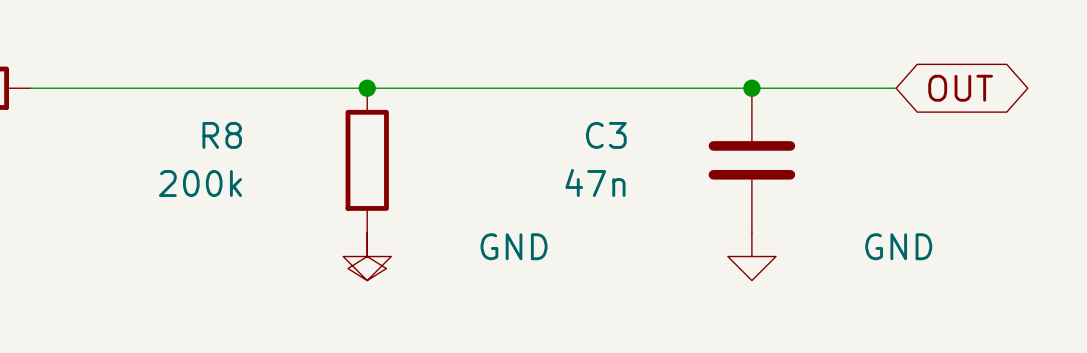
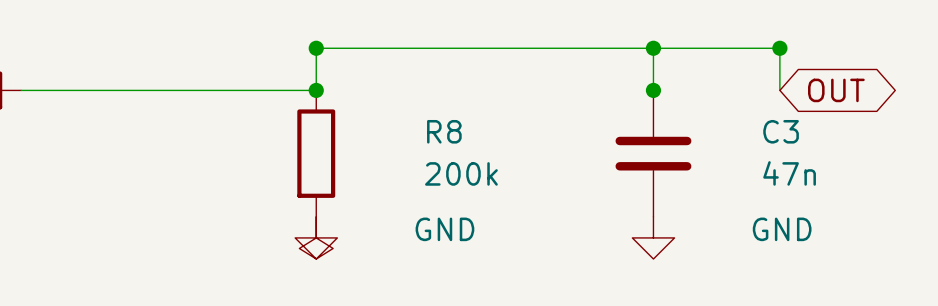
junction: none -> (316, 48)
wire: none -> (653, 48) (653, 90)
junction: none -> (653, 48)
junction: none -> (779, 48)
wire: (367, 88) (896, 88) -> (316, 90) (316, 48) (779, 48) (779, 90)
R8 name position: R8 (222, 135) -> R8 (444, 131)
C3 name position: C3 (606, 135) -> C3 (781, 131)
C3 value position: 47n (595, 182) -> 47n (789, 173)
R8 value position: 200k (200, 183) -> 200k (461, 173)

